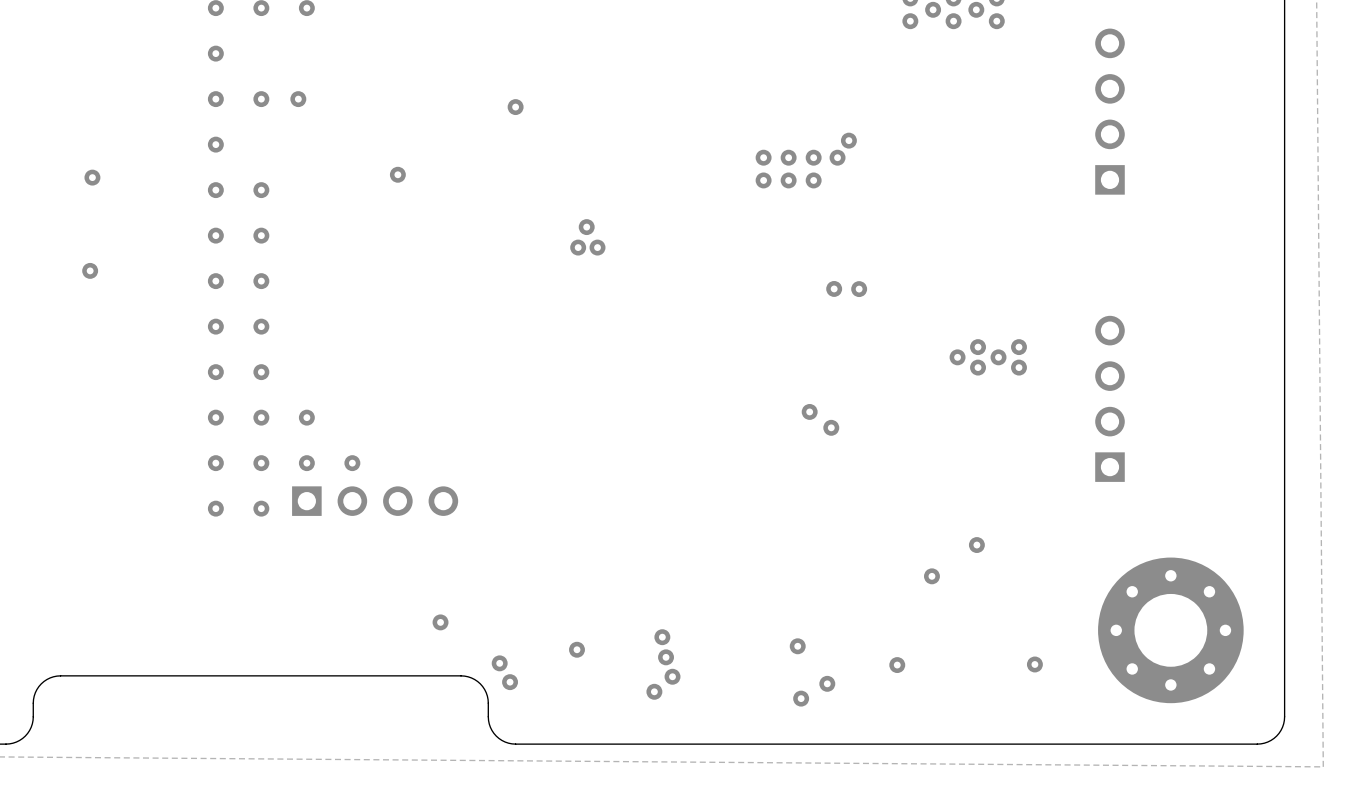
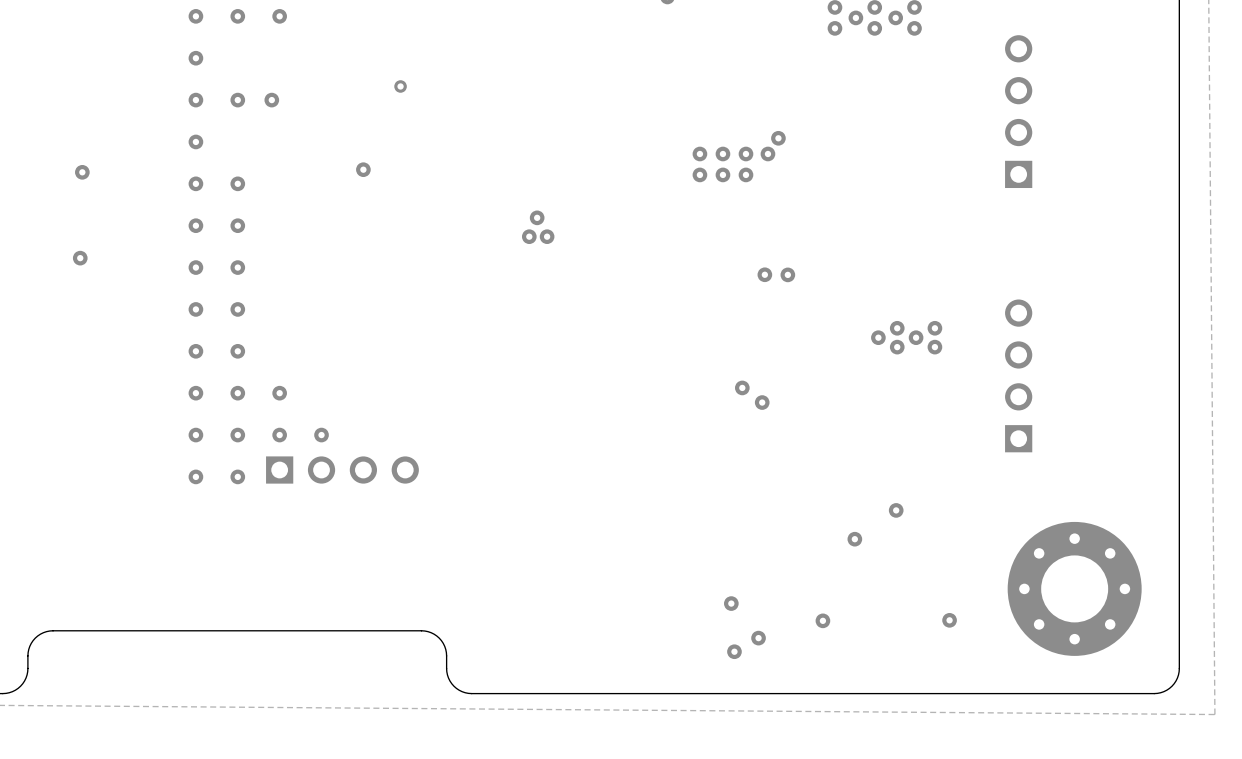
via: none -> (400, 86)
via: (515, 107) -> none
via: (440, 622) -> none
via: (662, 637) -> none
via: (576, 649) -> none
via: (666, 657) -> none
via: (499, 663) -> none
via: (672, 676) -> none
via: (510, 682) -> none
via: (654, 691) -> none

